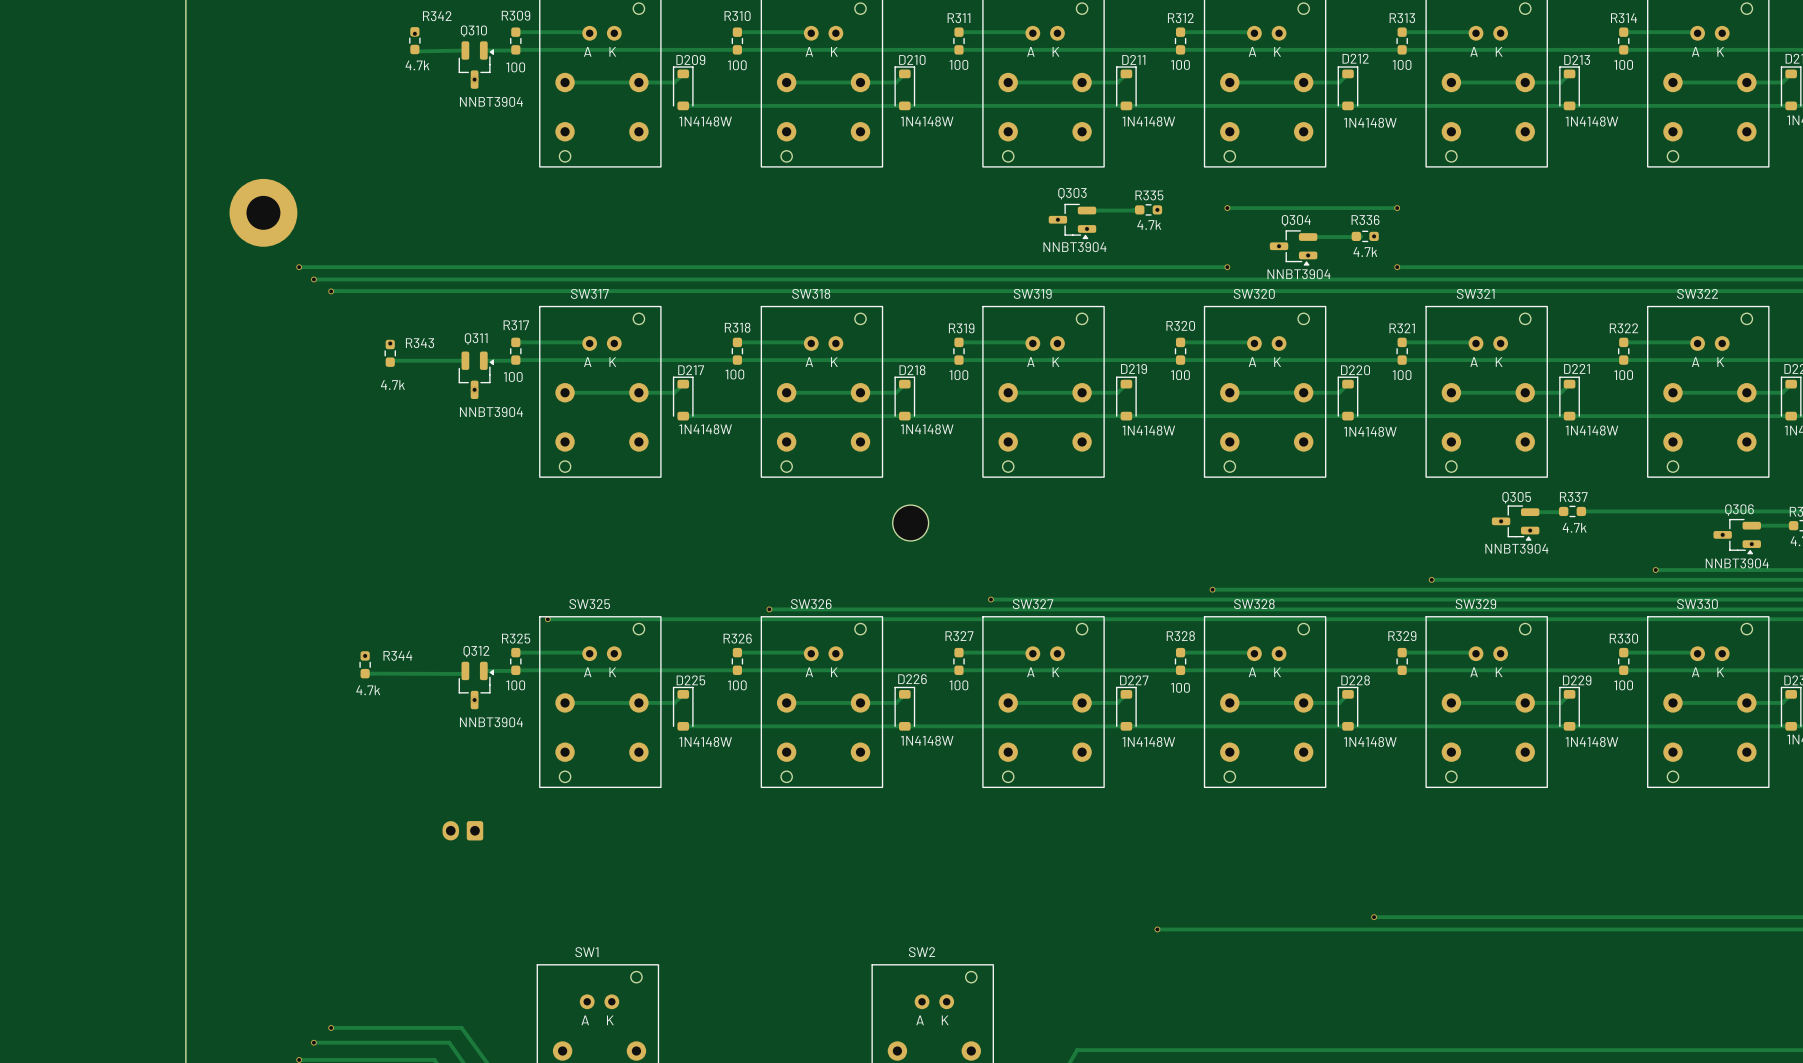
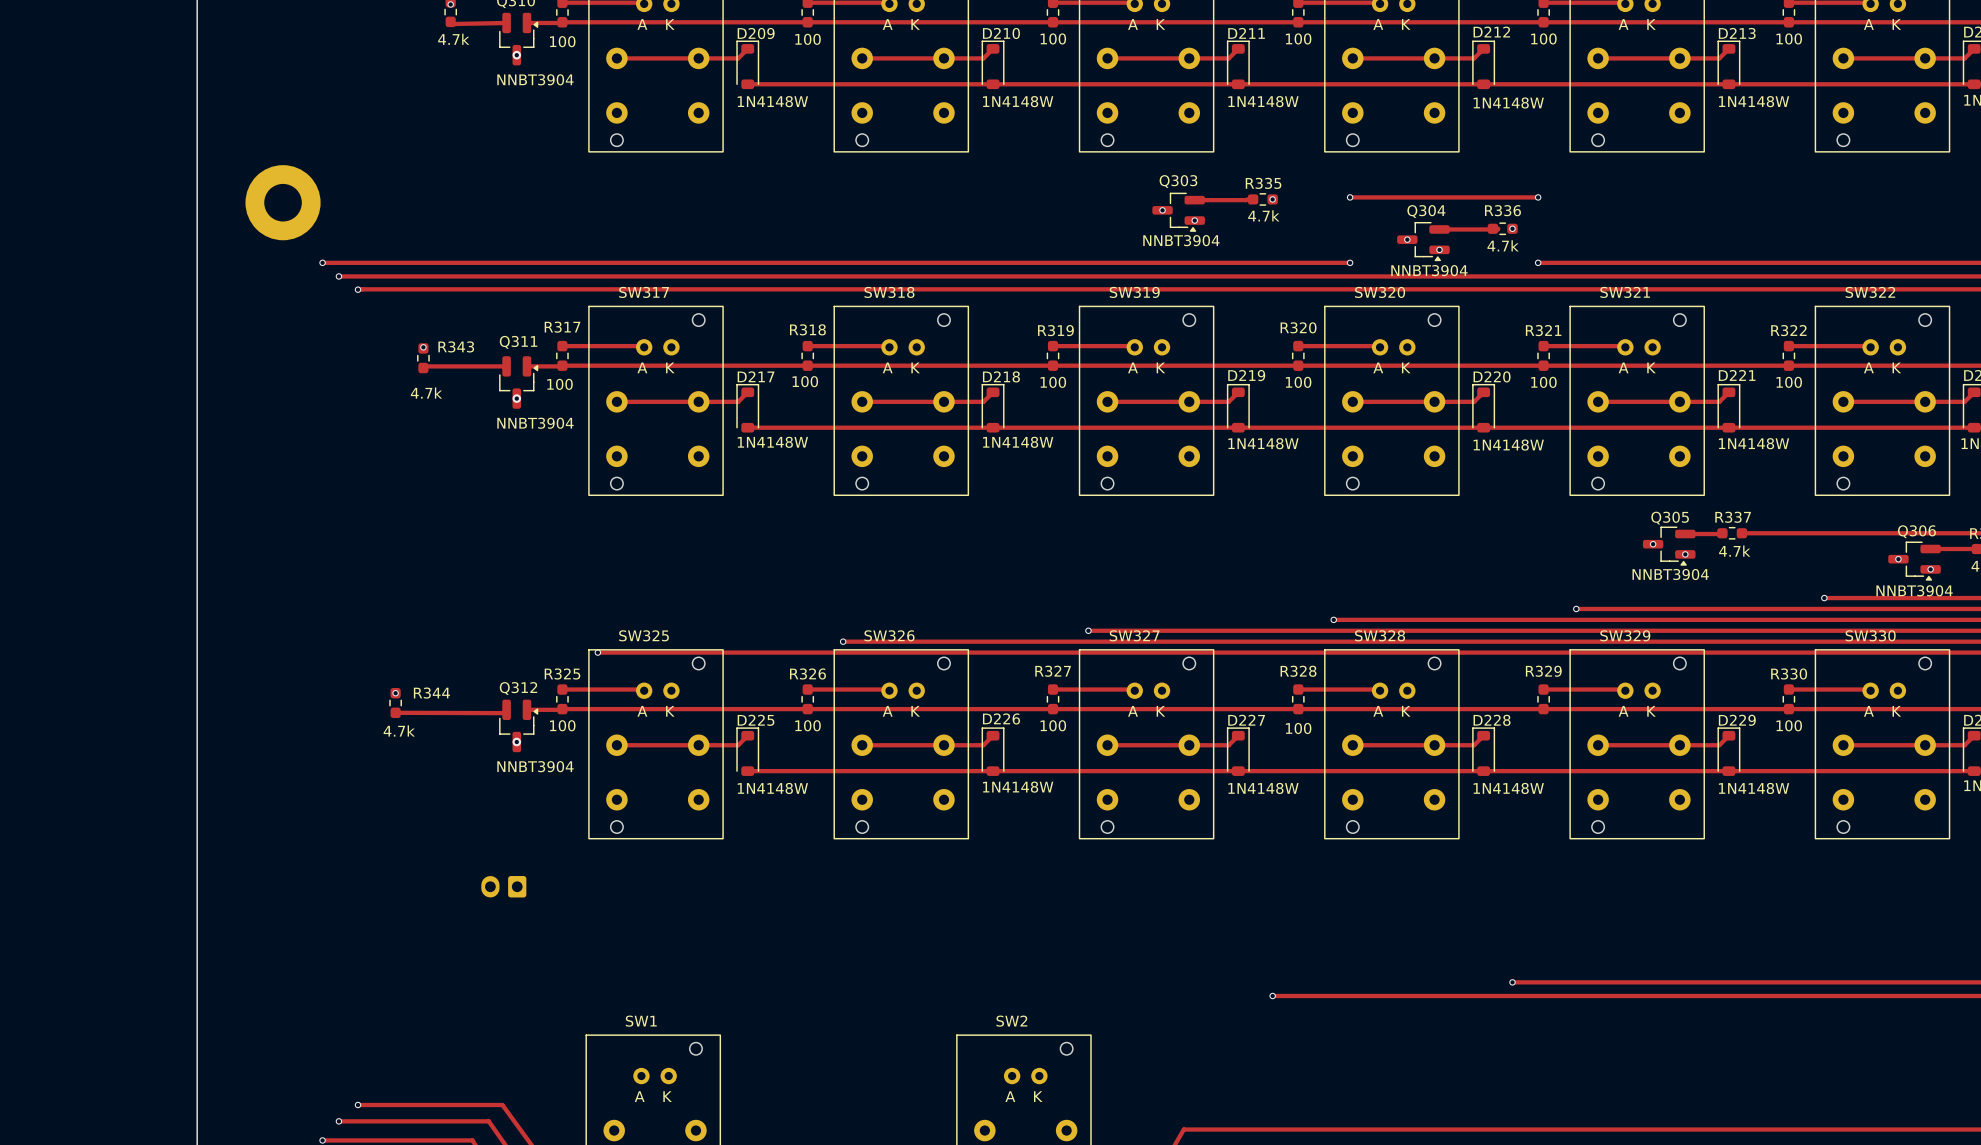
part: (910, 523) -> none

